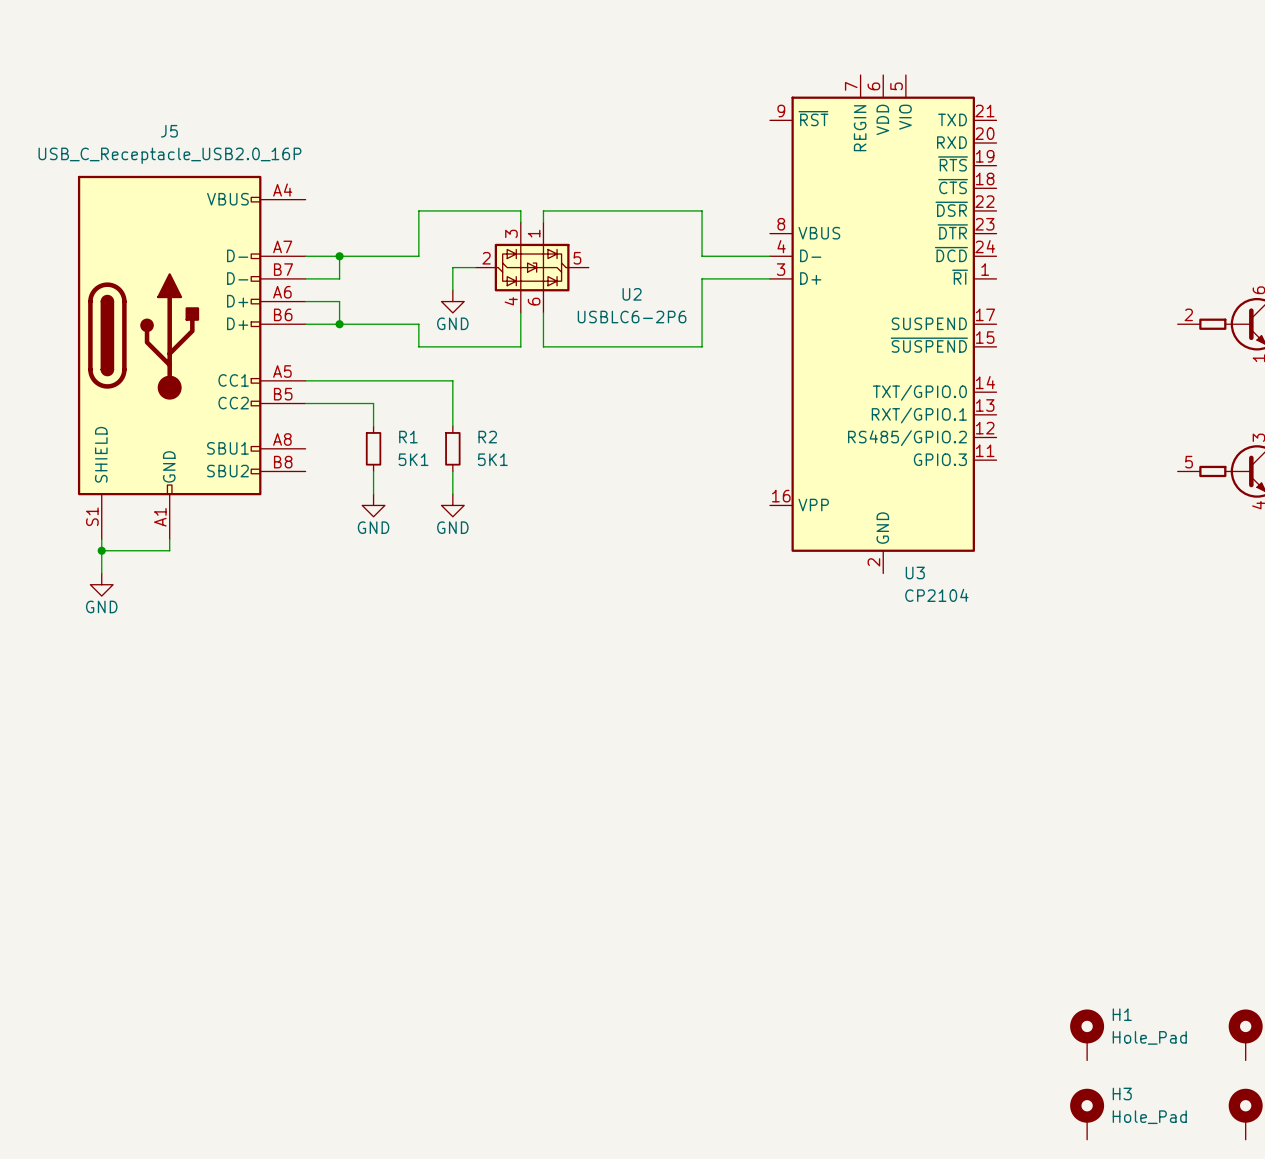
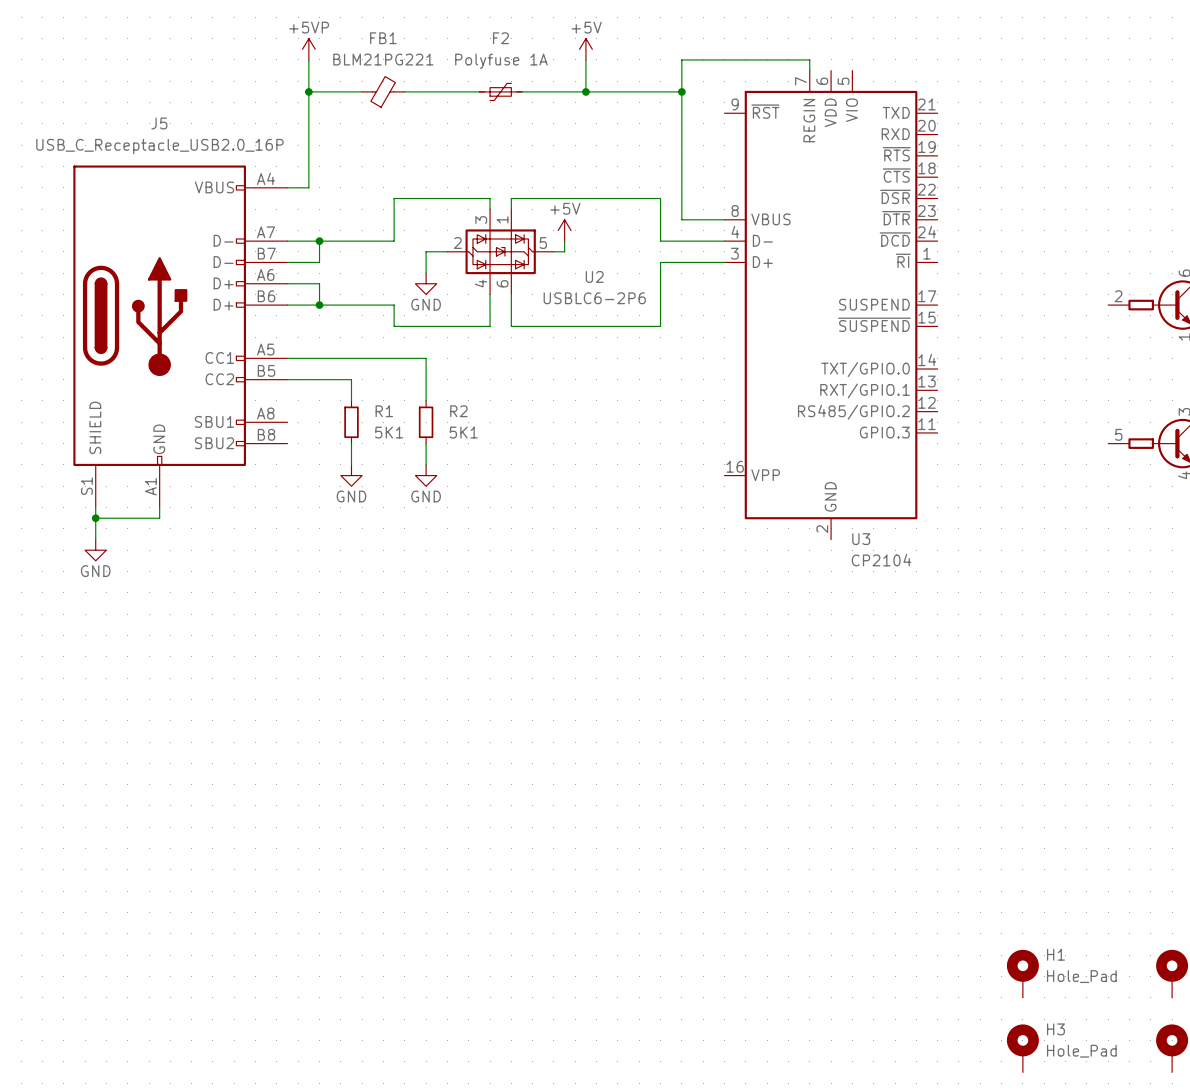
power symbol: none -> +5VP (308, 49)
power symbol: none -> +5V (585, 49)
wire: none -> (308, 59) (308, 187) (287, 187)
wire: none -> (585, 59) (585, 91)
wire: none -> (809, 70) (809, 59) (681, 59) (681, 219) (724, 219)
wire: none -> (308, 91) (362, 91)
junction: none -> (308, 91)
FB1: none -> BLM21PG221 (383, 91)
wire: none -> (404, 91) (479, 91)
F2: none -> Polyfuse 1A (500, 91)
wire: none -> (522, 91) (681, 91)
junction: none -> (585, 91)
junction: none -> (681, 91)
power symbol: none -> +5V (564, 230)
wire: none -> (564, 241) (564, 251) (553, 251)

